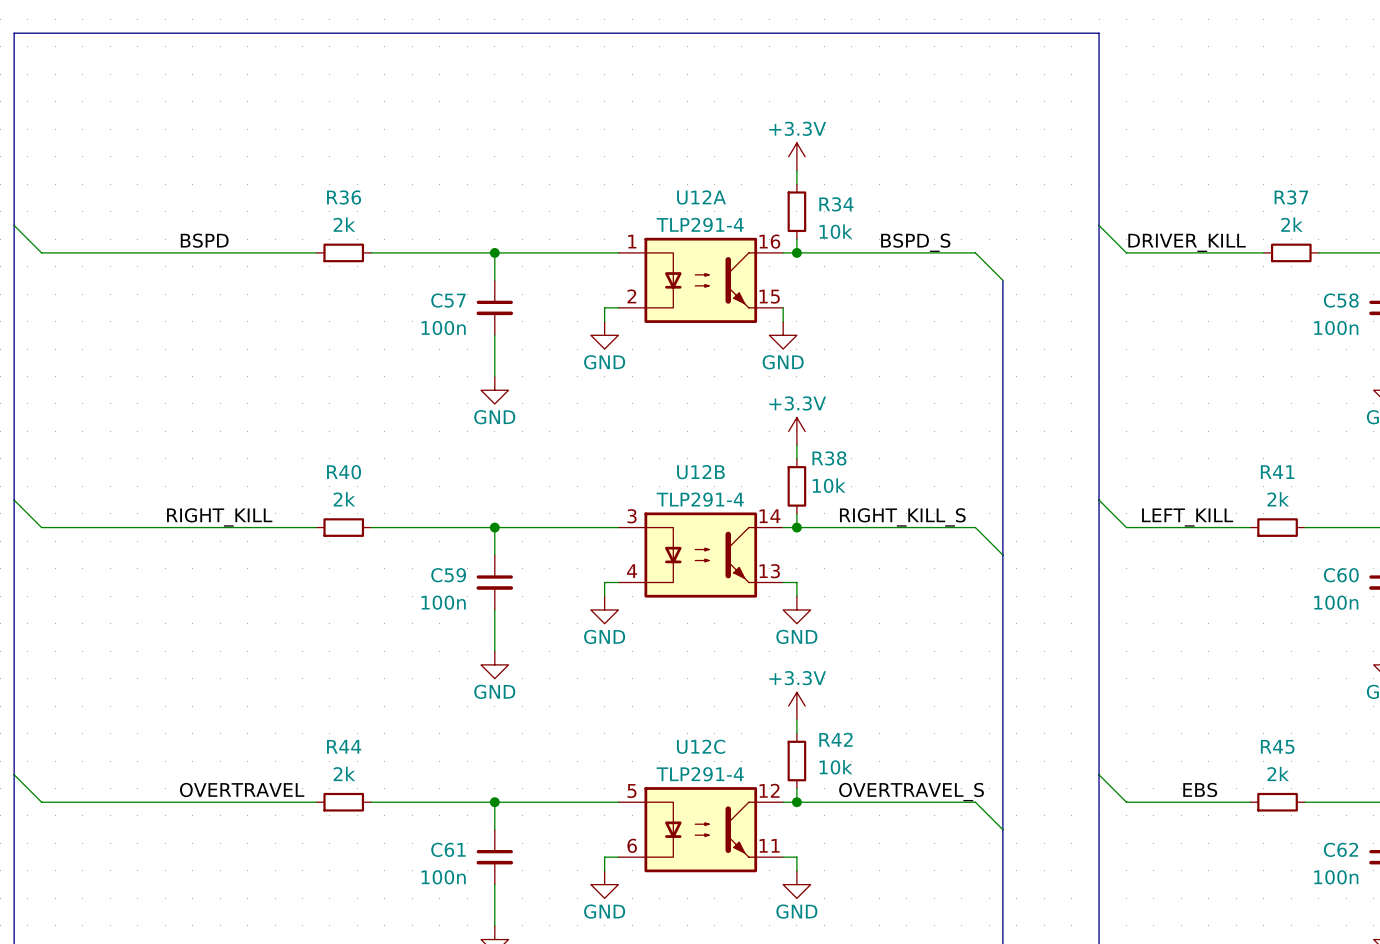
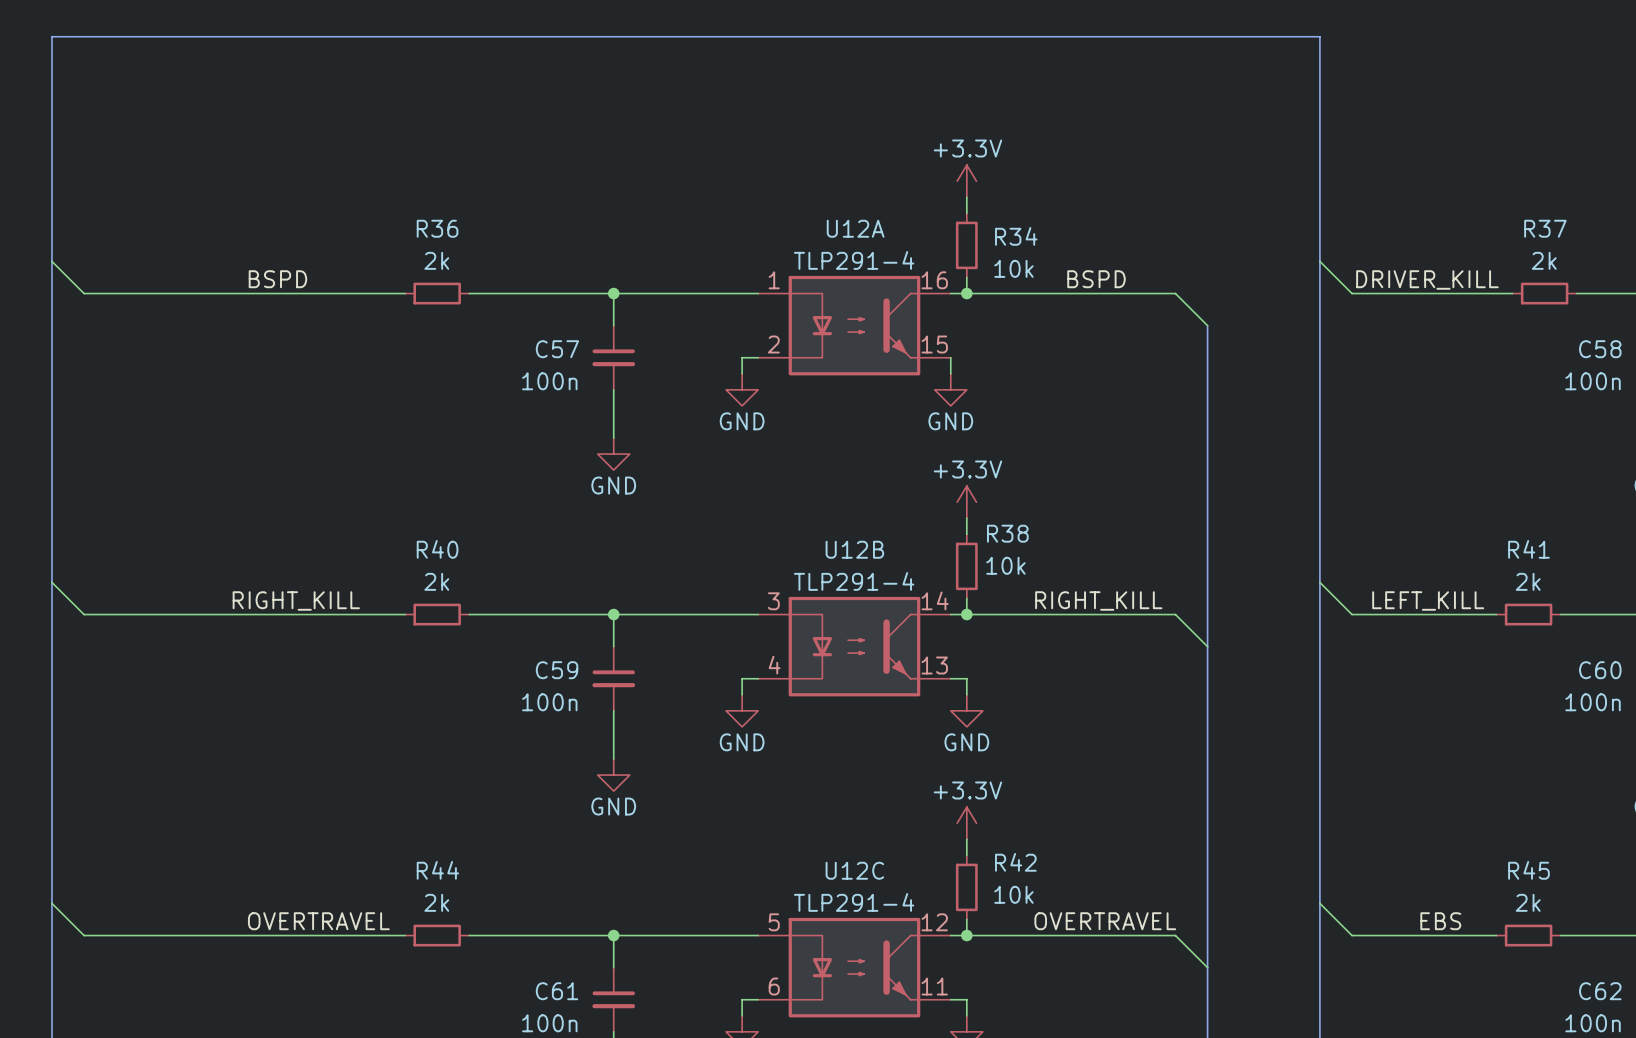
label: BSPD_S (915, 242) -> BSPD (1096, 279)
label: RIGHT_KILL_S (902, 517) -> RIGHT_KILL (1098, 600)
label: OVERTRAVEL_S (911, 792) -> OVERTRAVEL (1105, 921)

